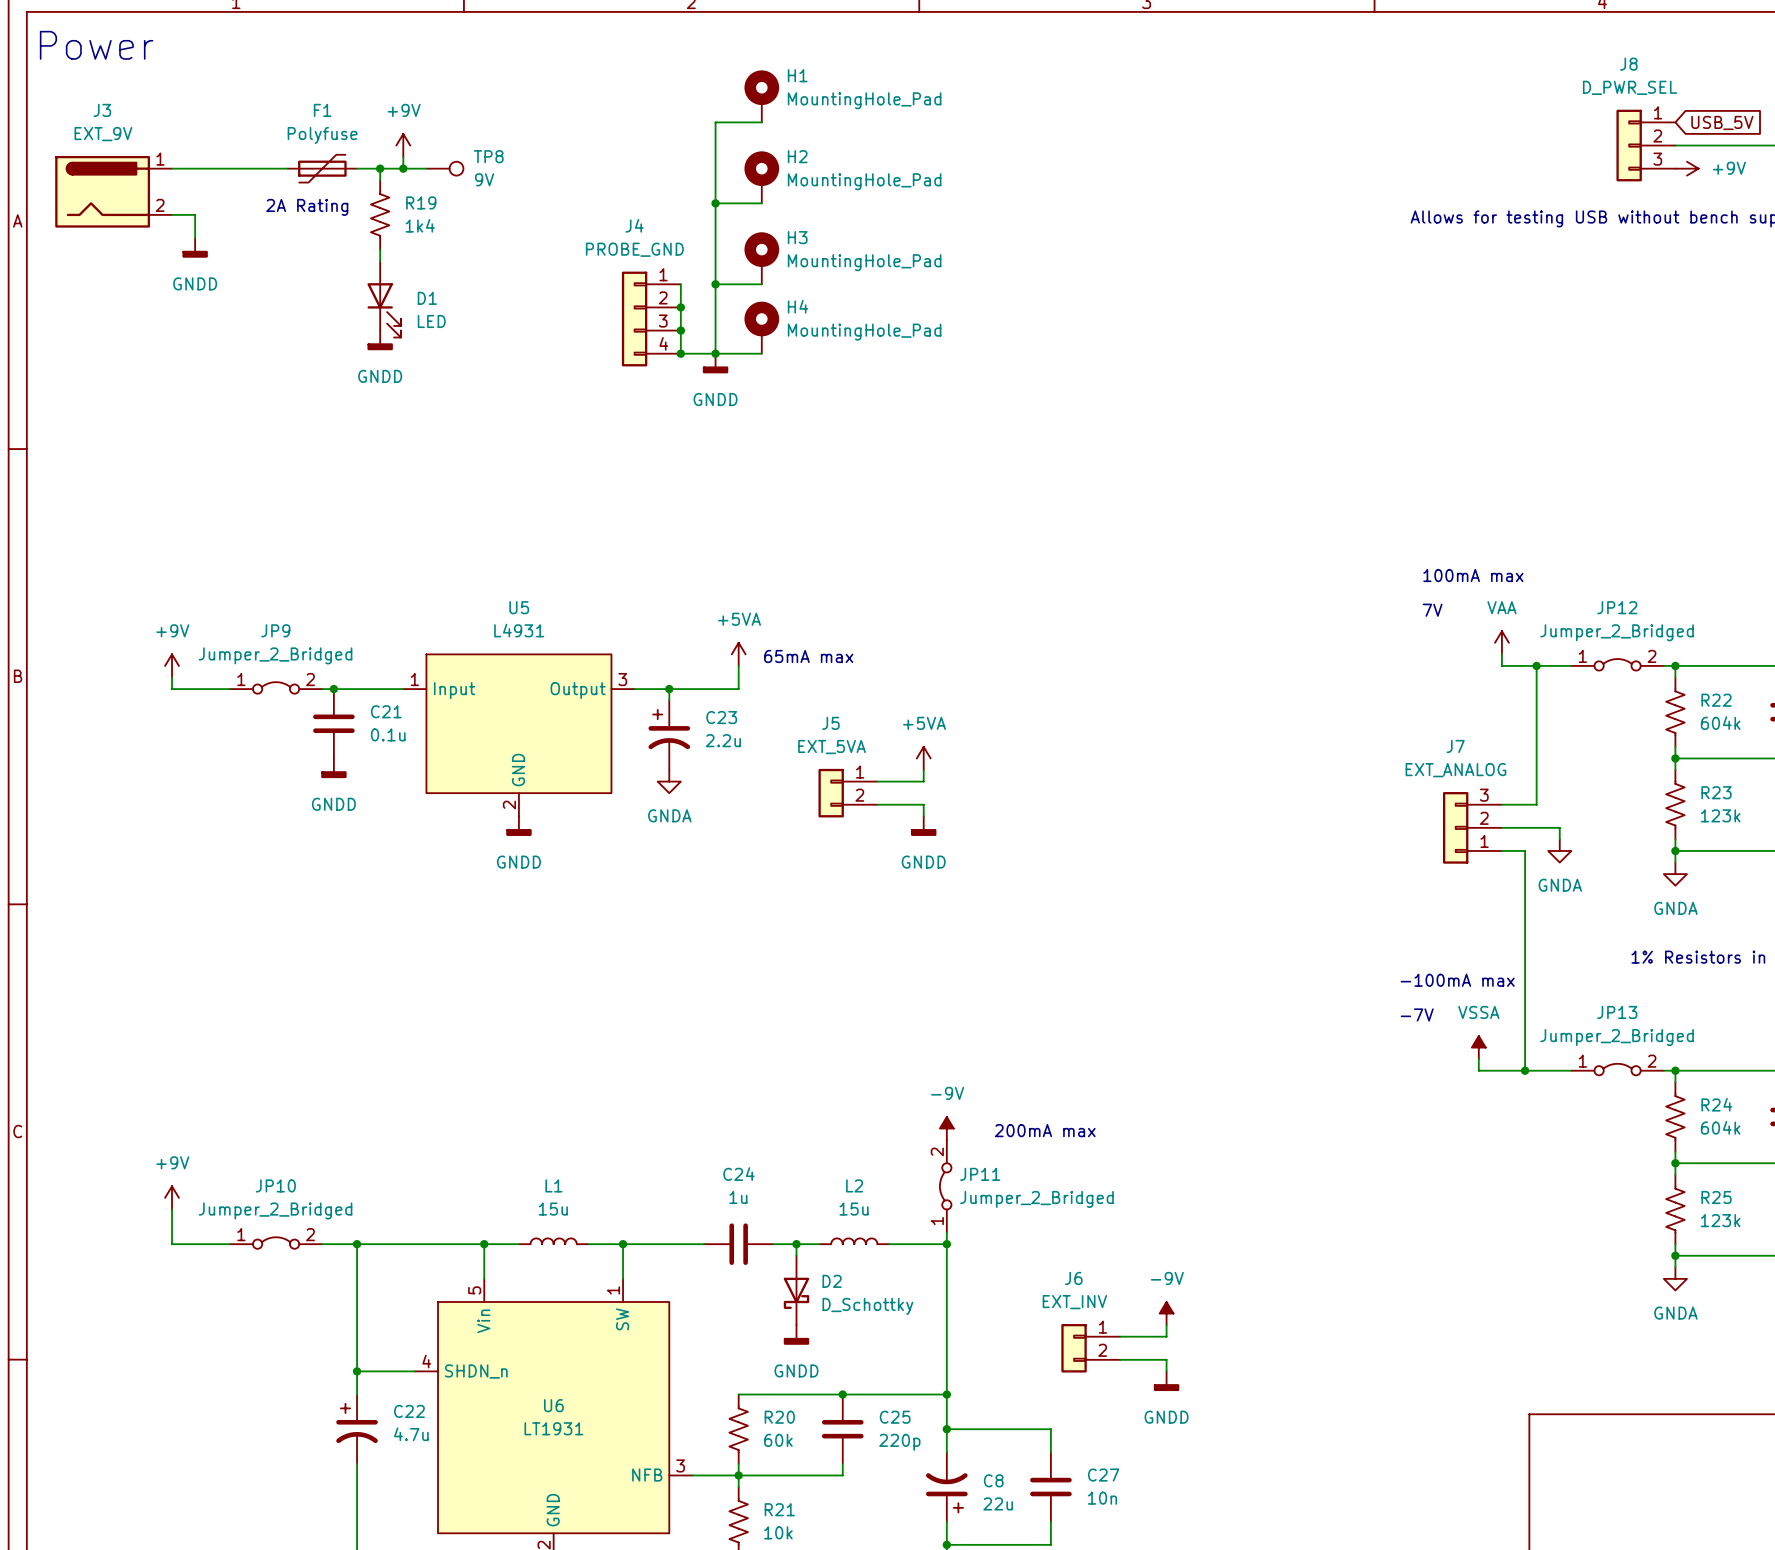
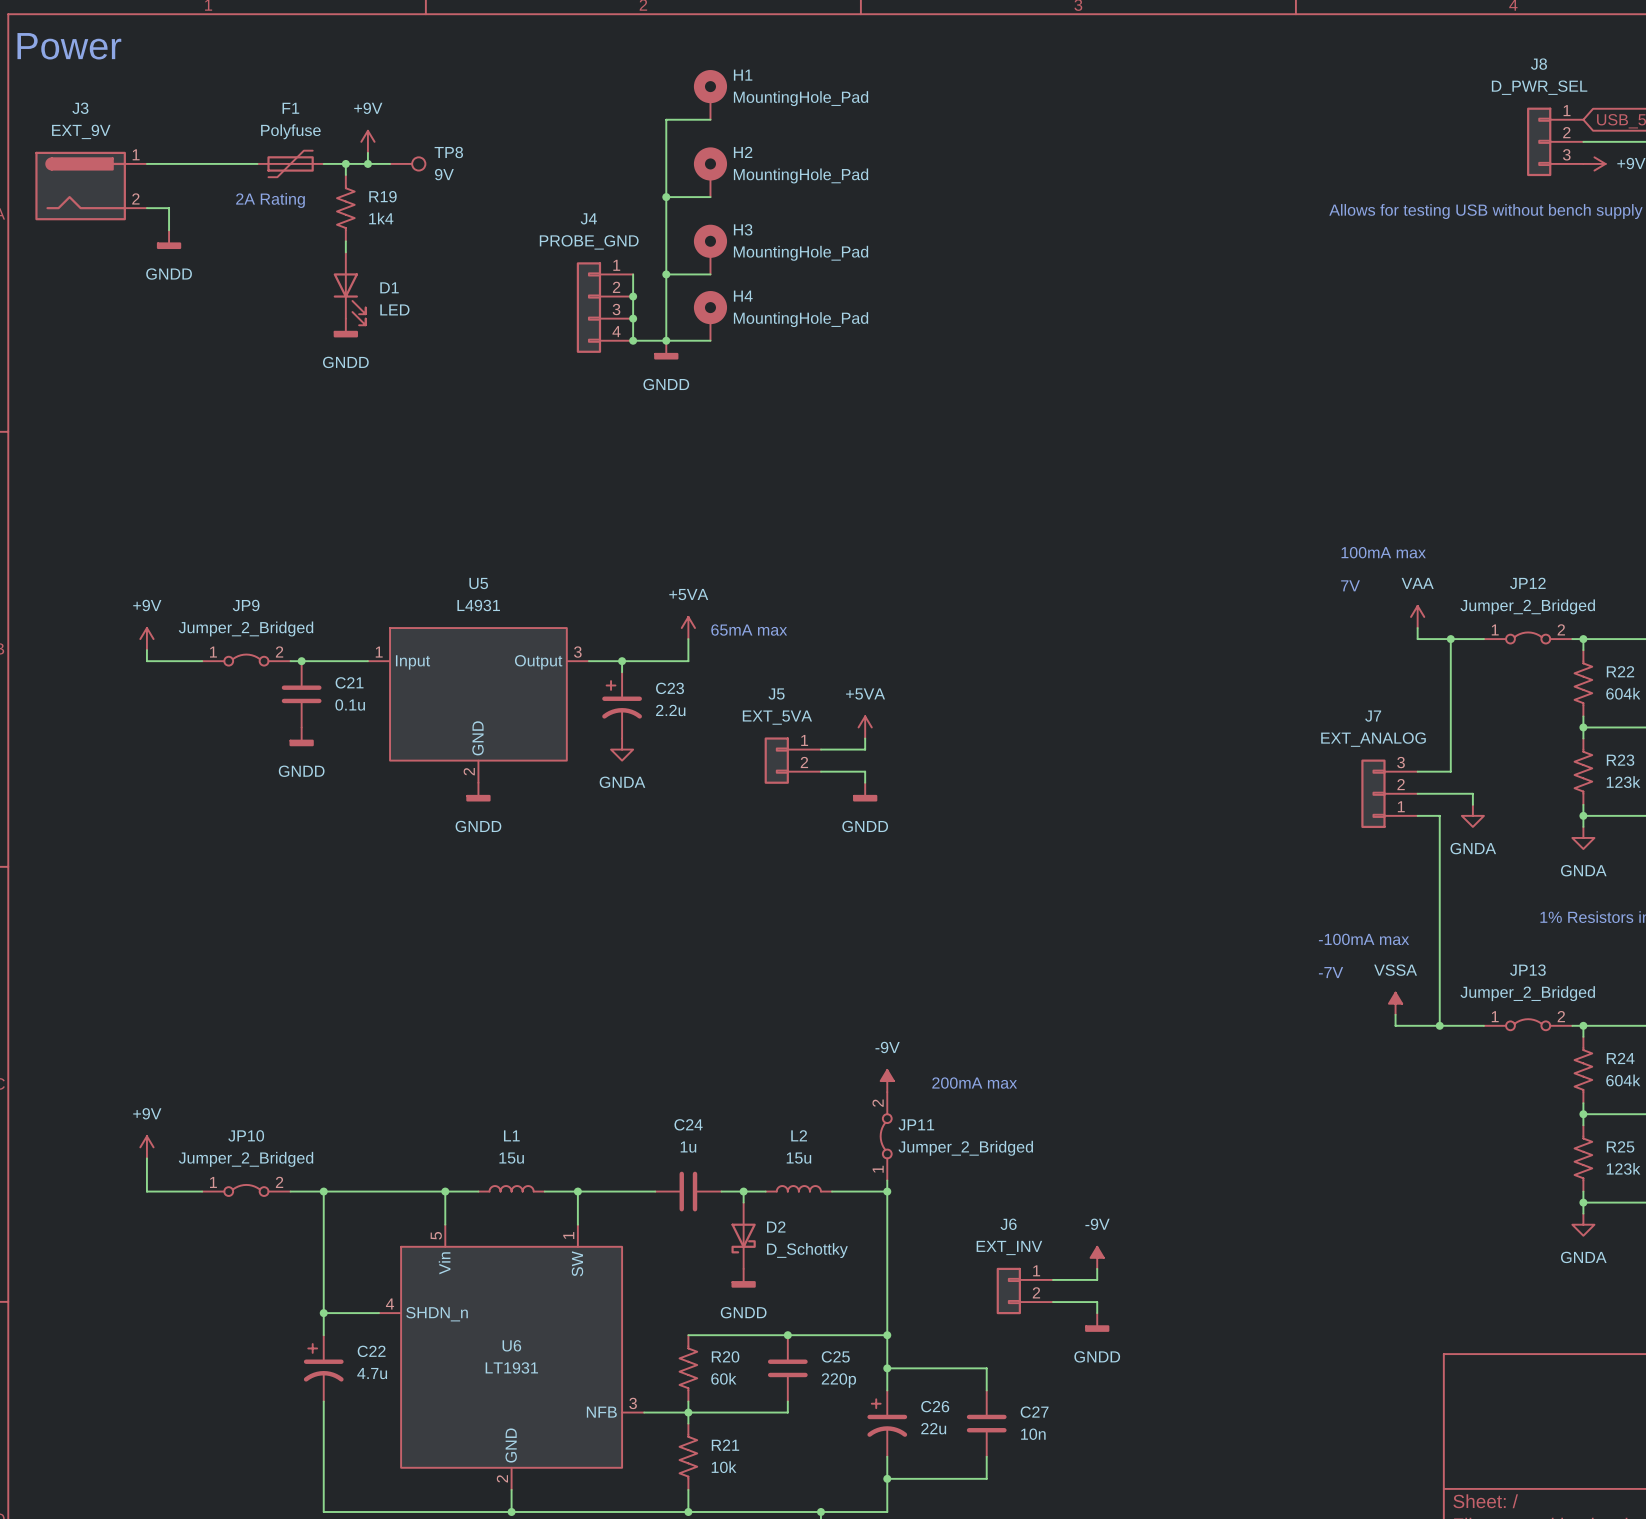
C8: 22u (946, 1487) -> none
C26: none -> 22u (887, 1423)

